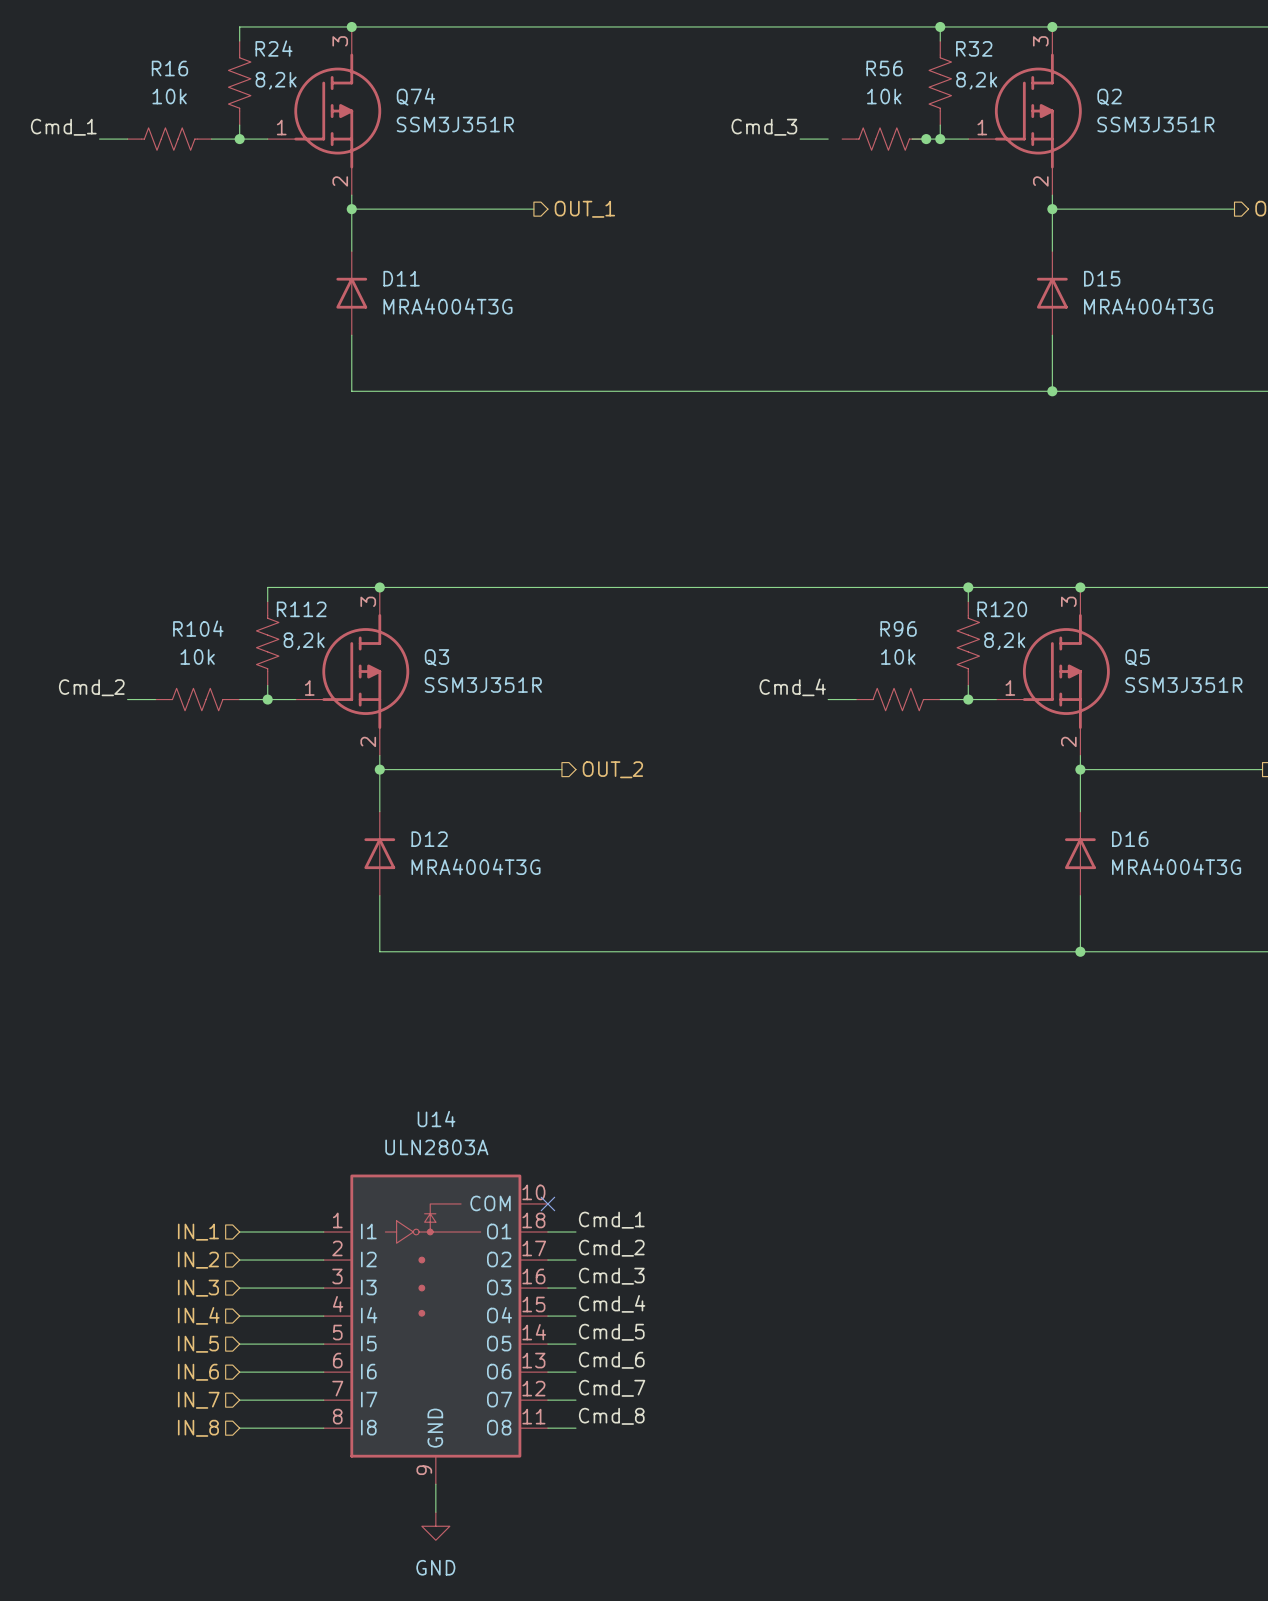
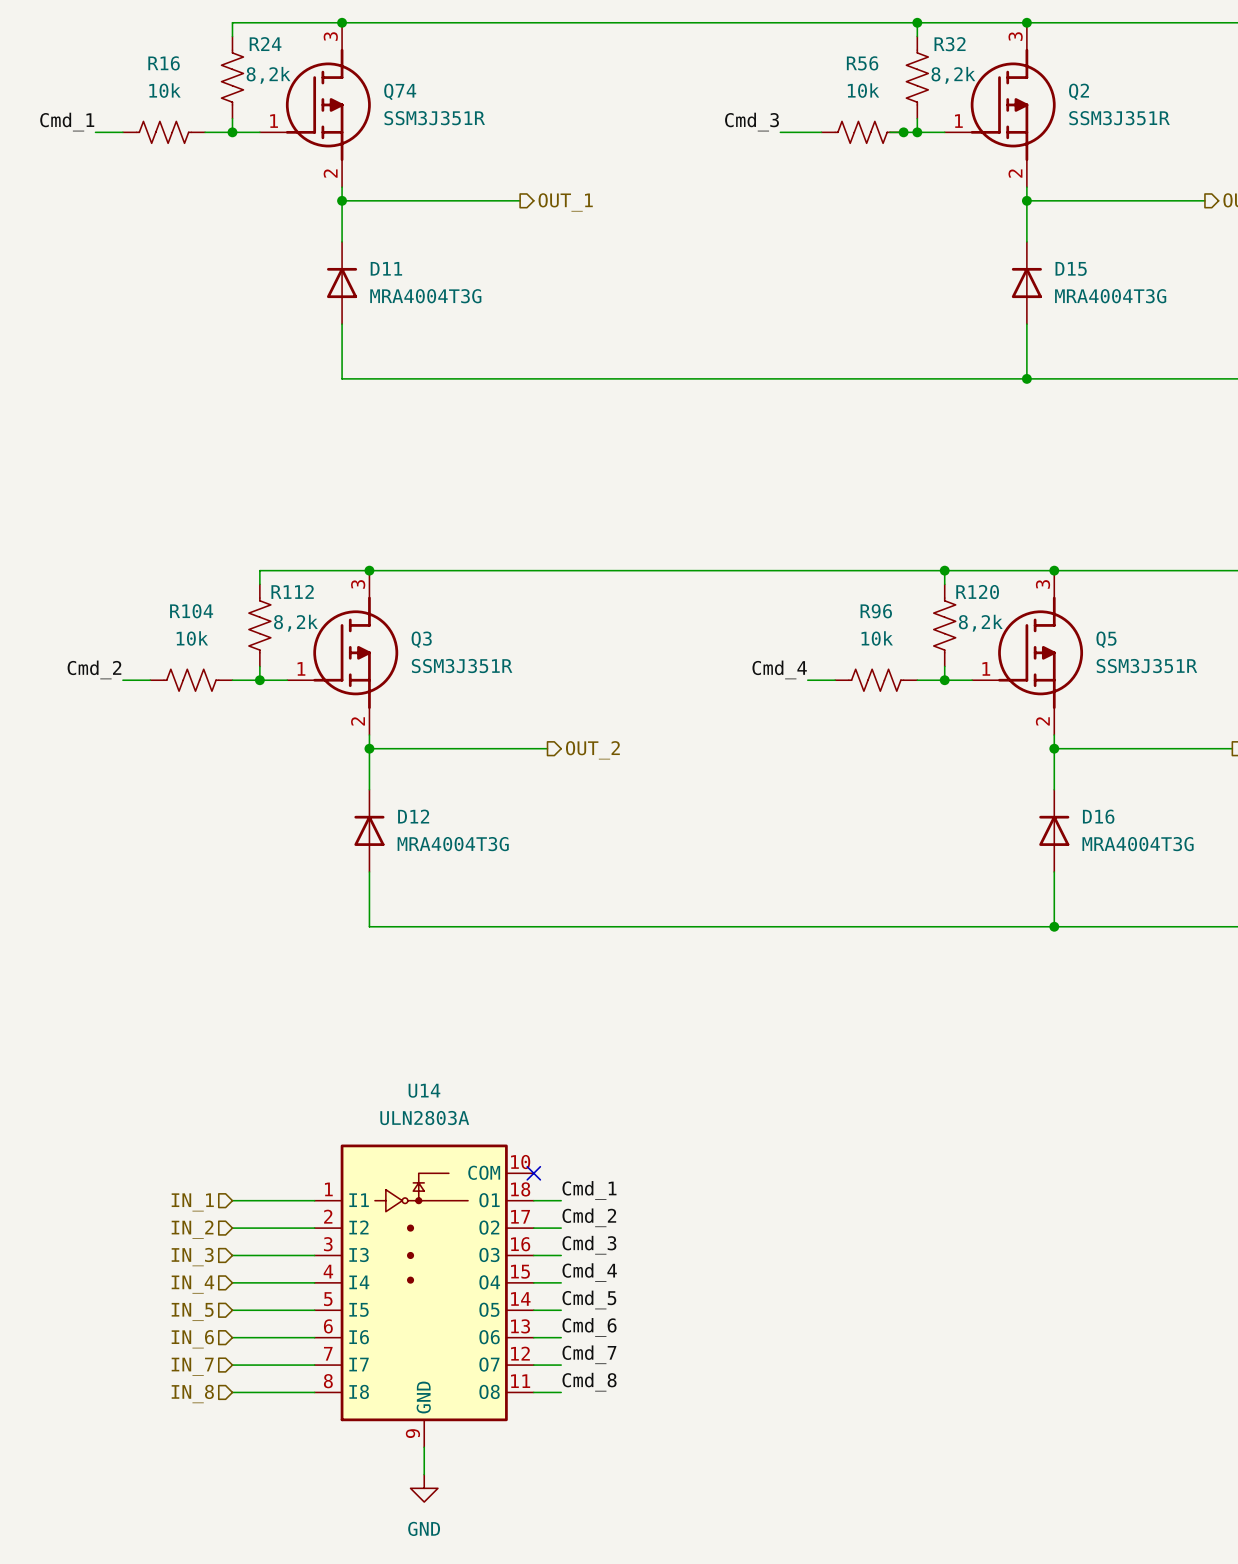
wire: none -> (807, 132) (821, 132)

